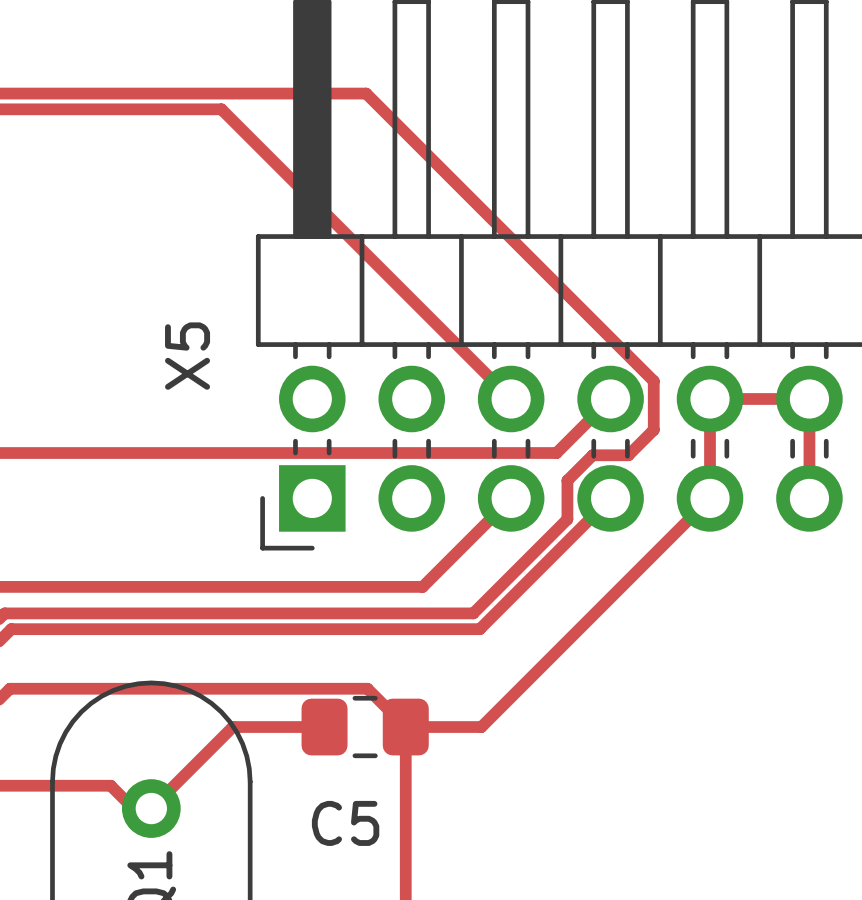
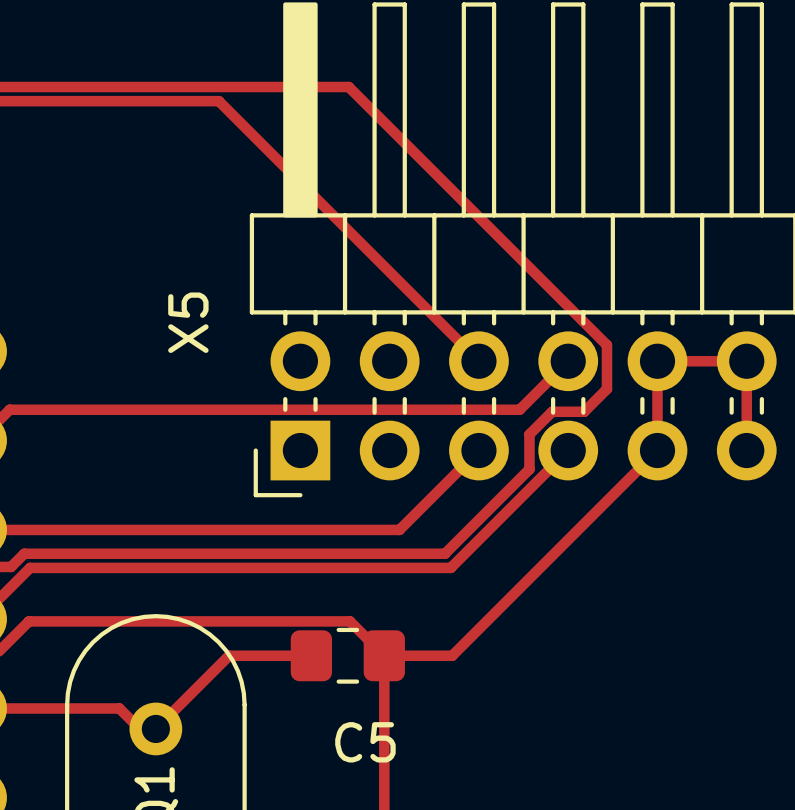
C5 name position: C5 (345, 823) -> C5 (365, 742)

